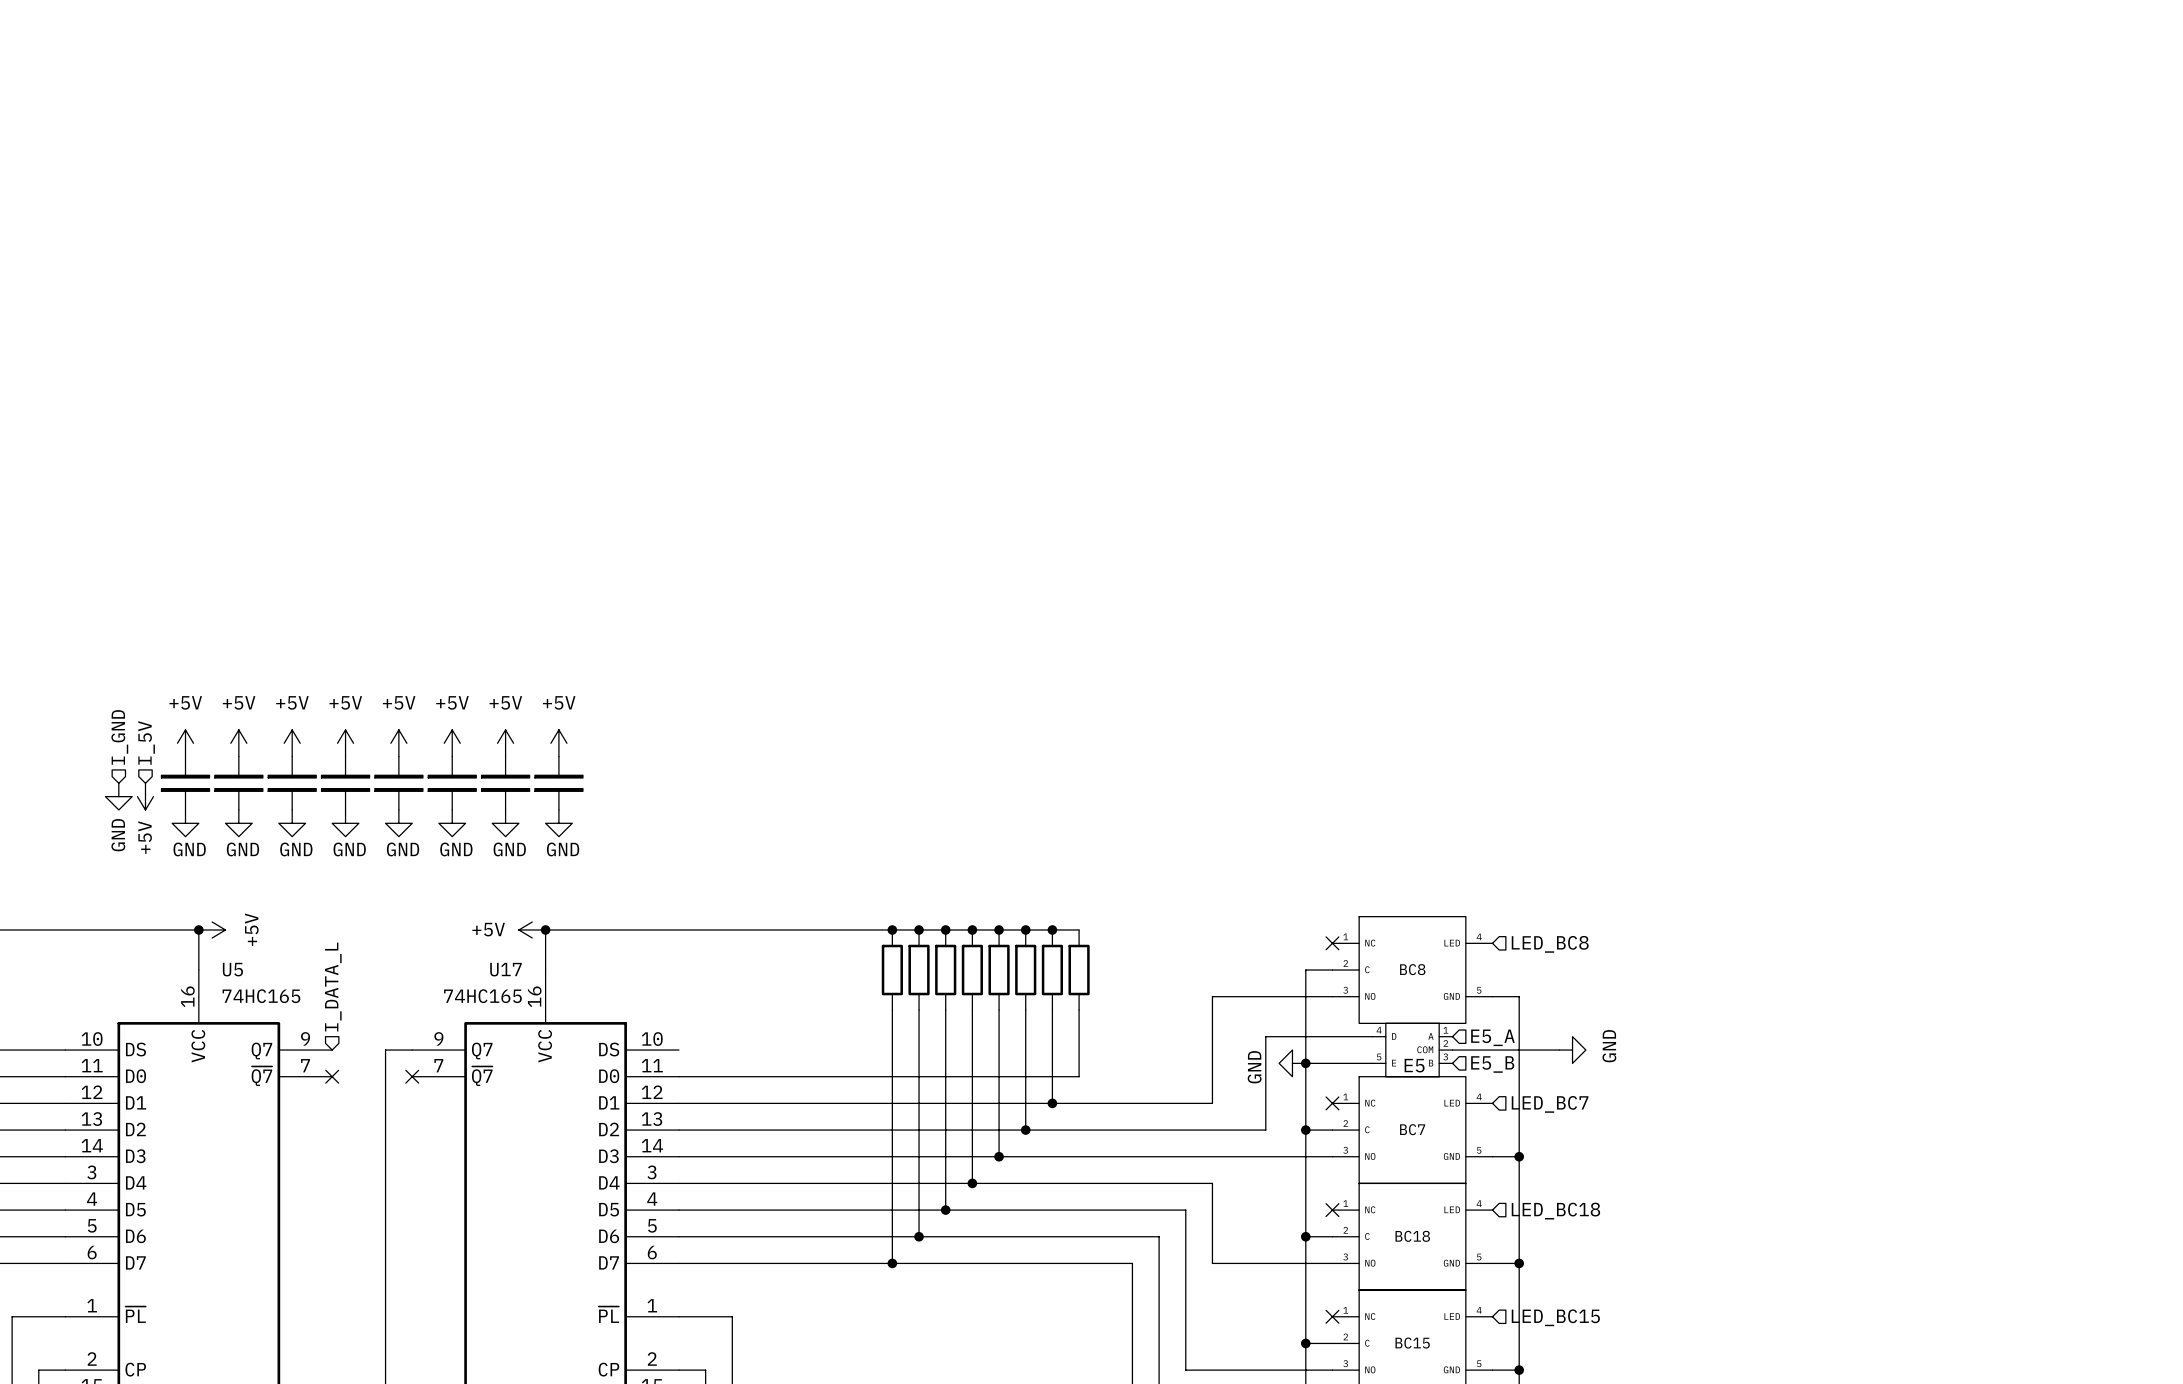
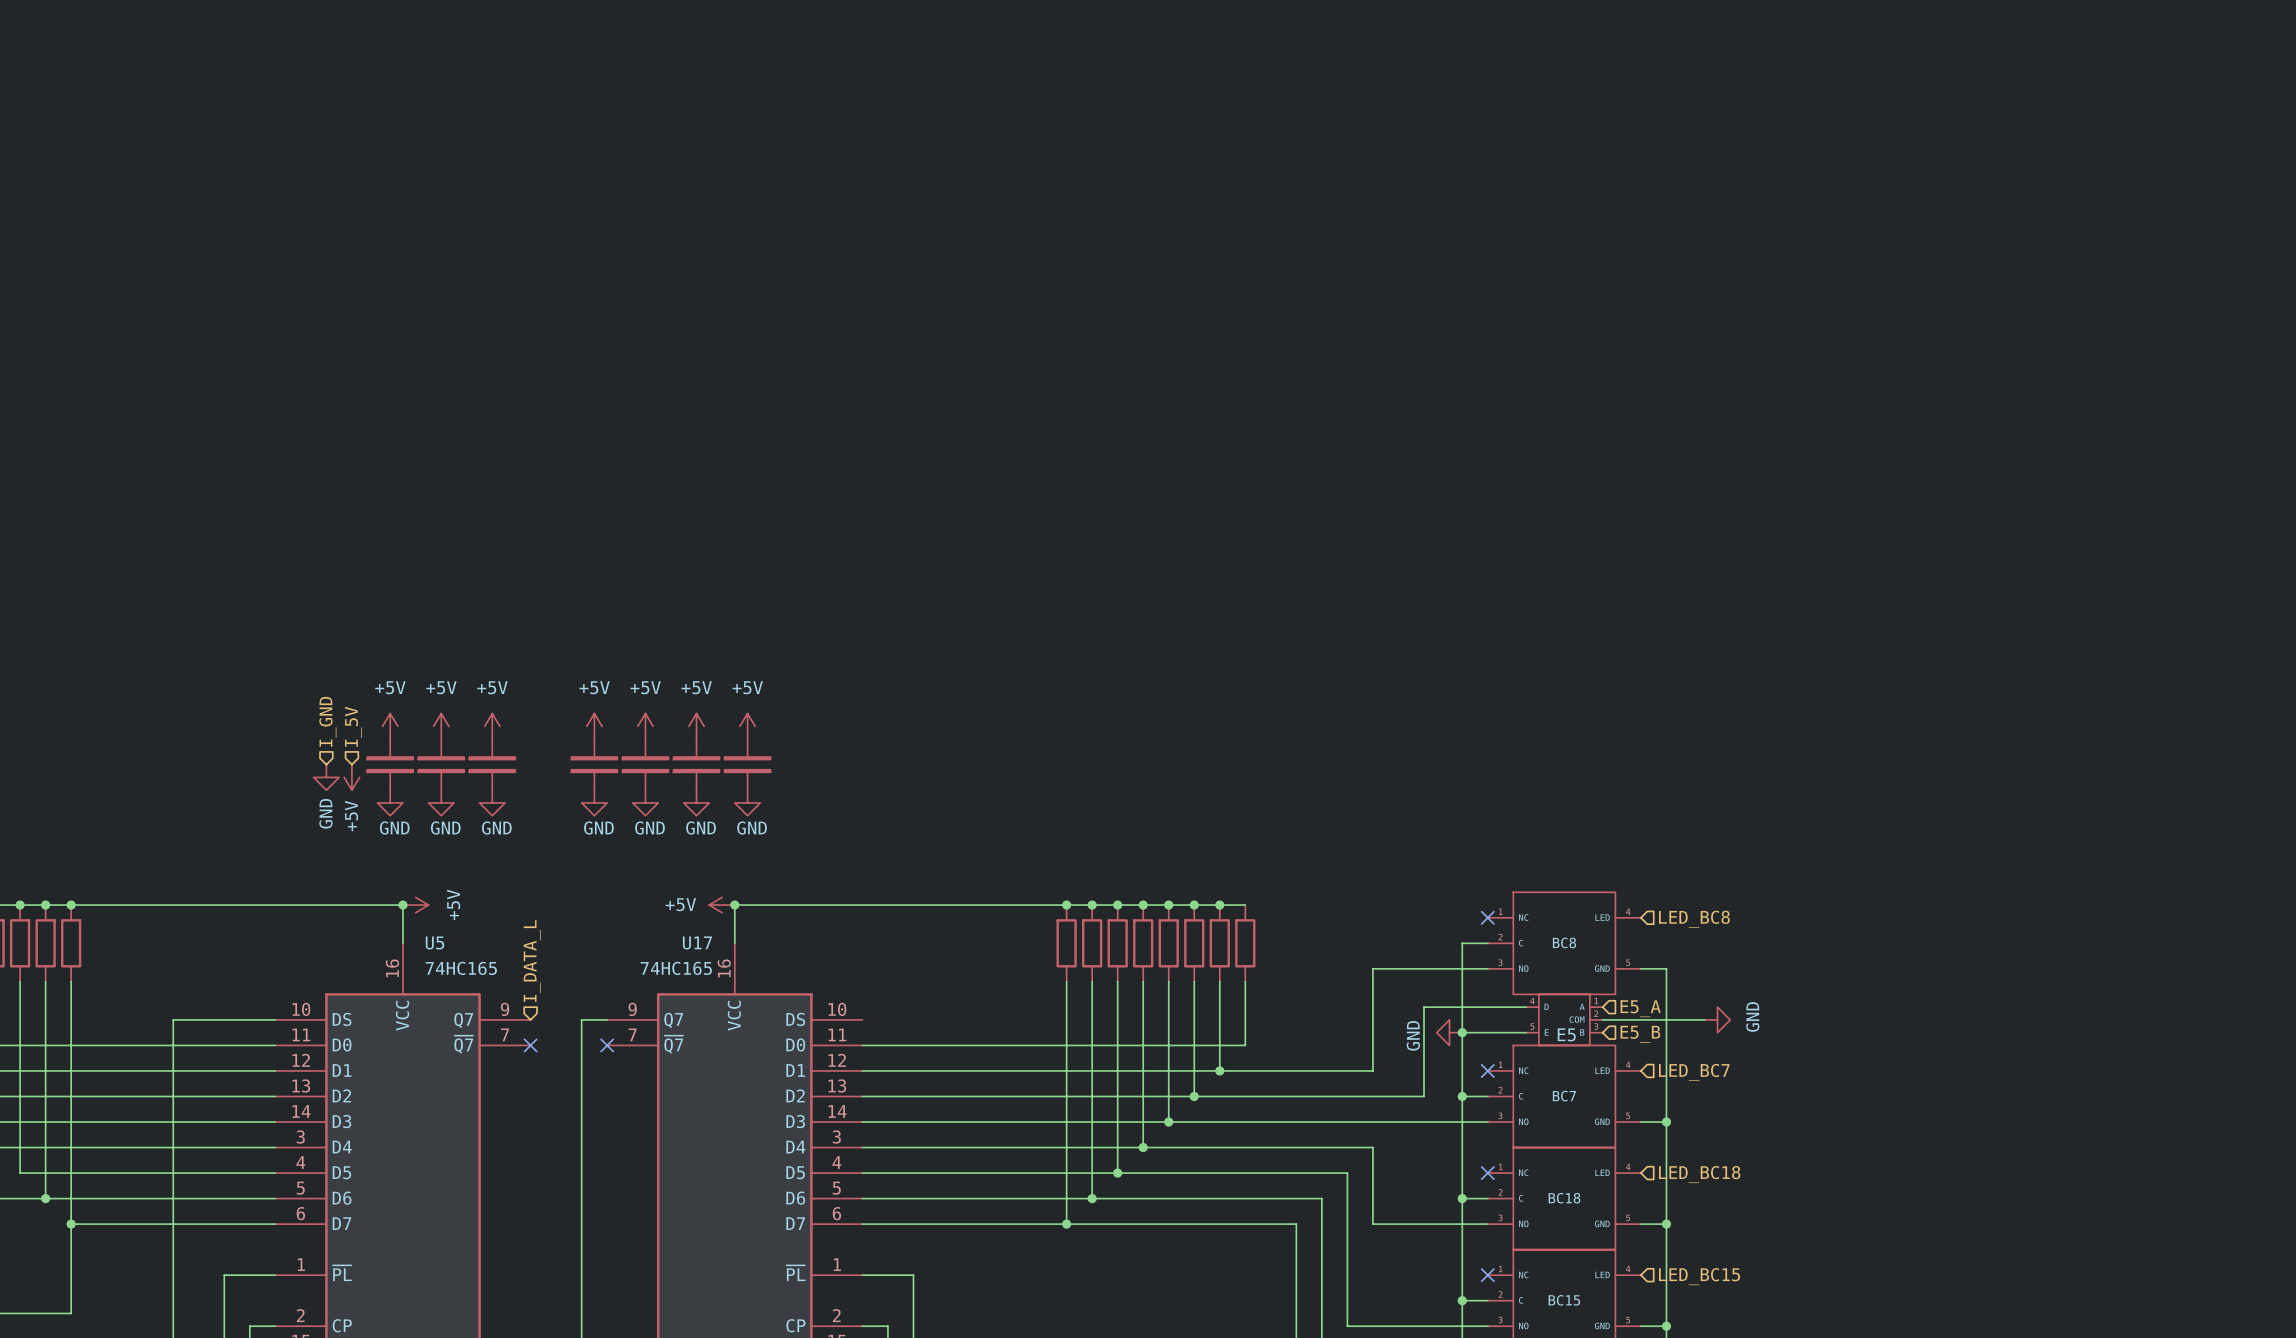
power symbol: +5V (345, 743) -> none
part: (345, 783) -> none
power symbol: GND (345, 823) -> none

